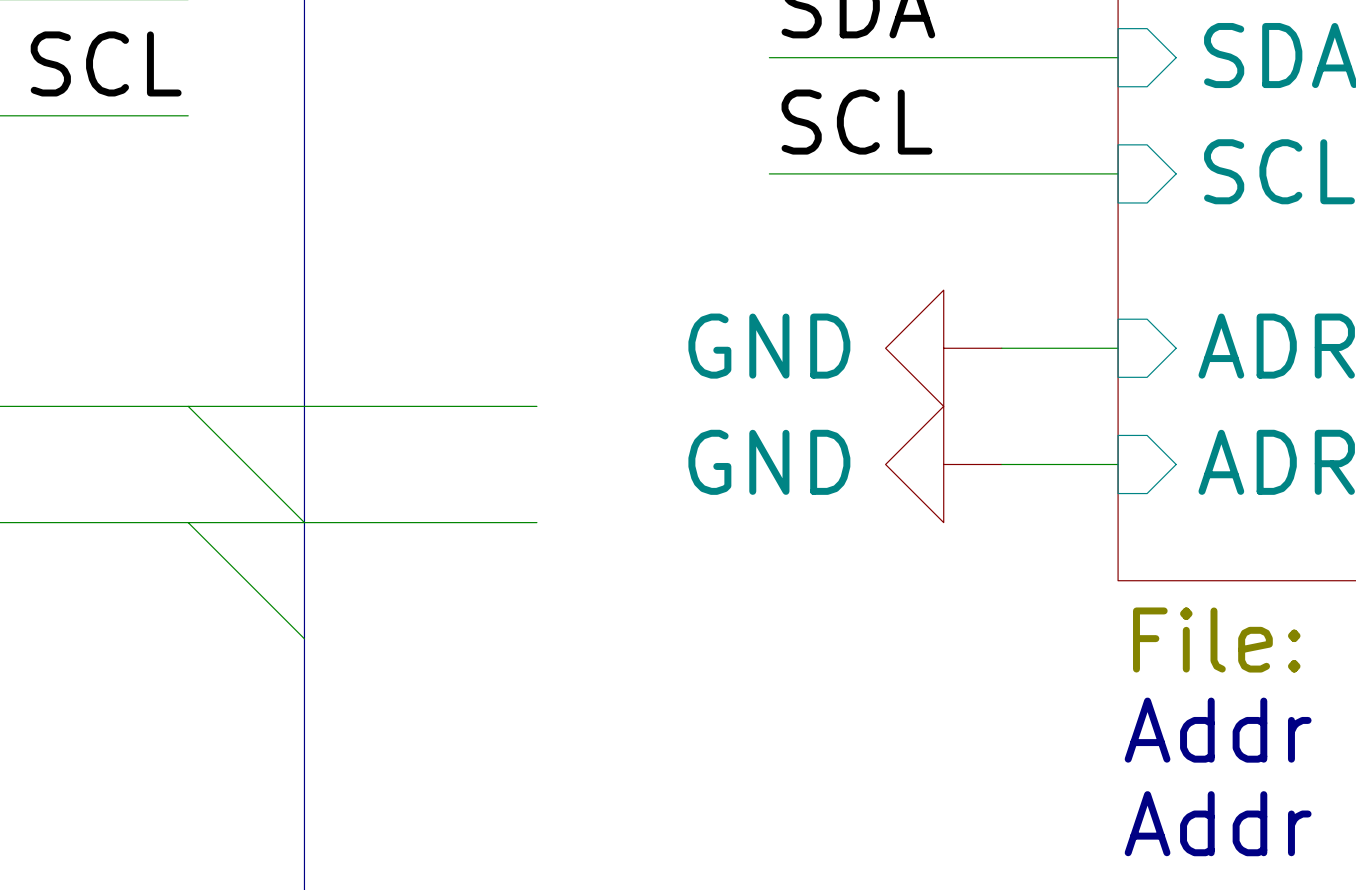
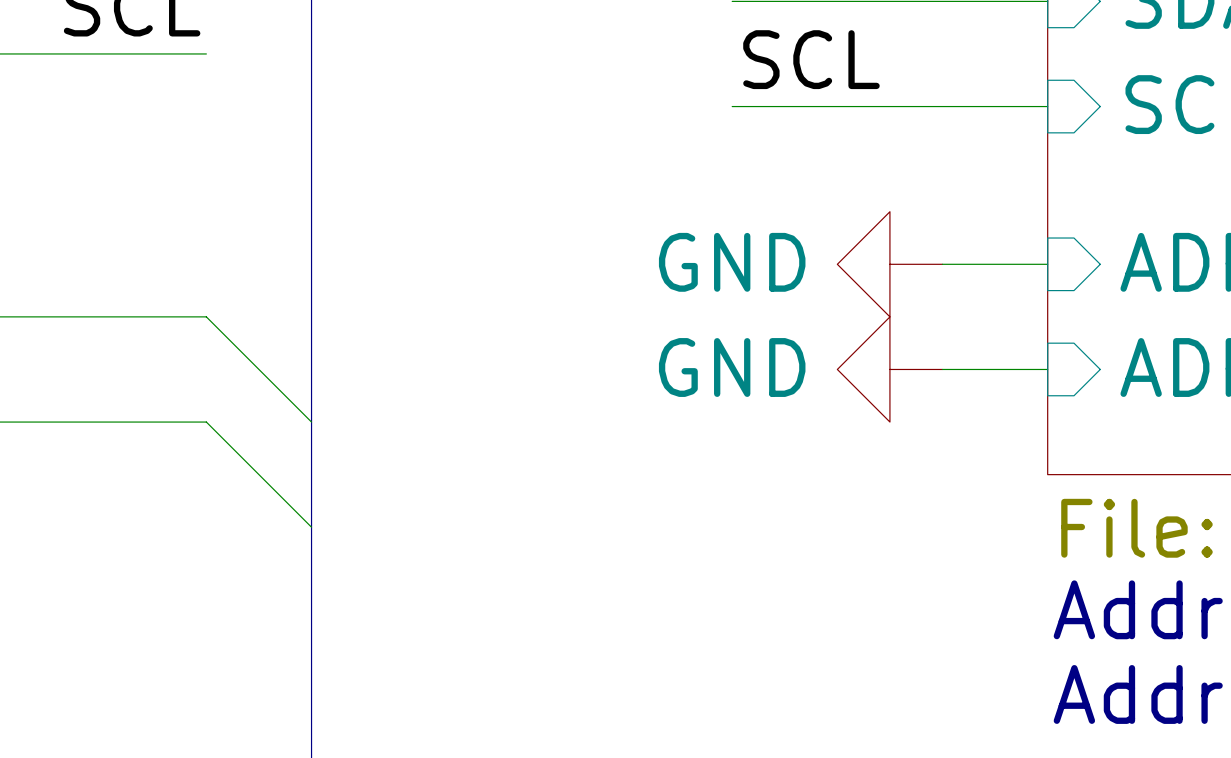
wire: (188, 406) (536, 406) -> none
wire: (188, 522) (536, 522) -> none

